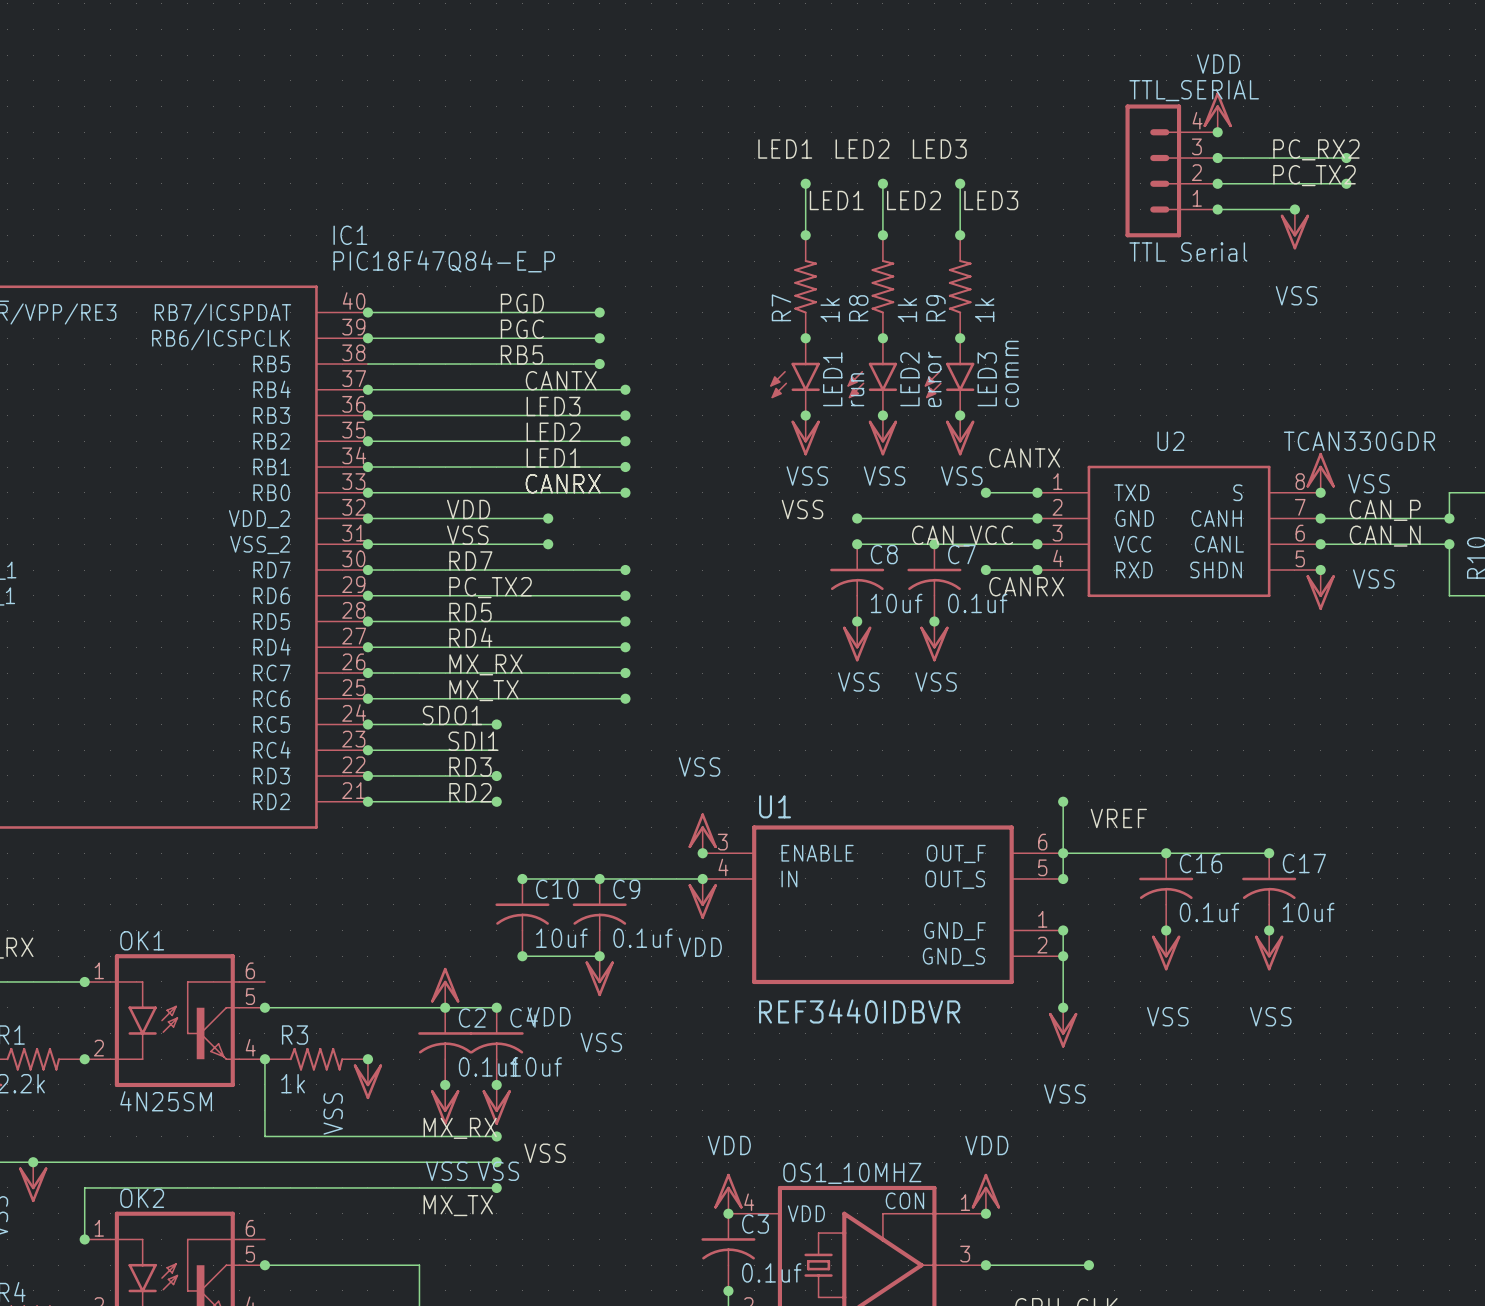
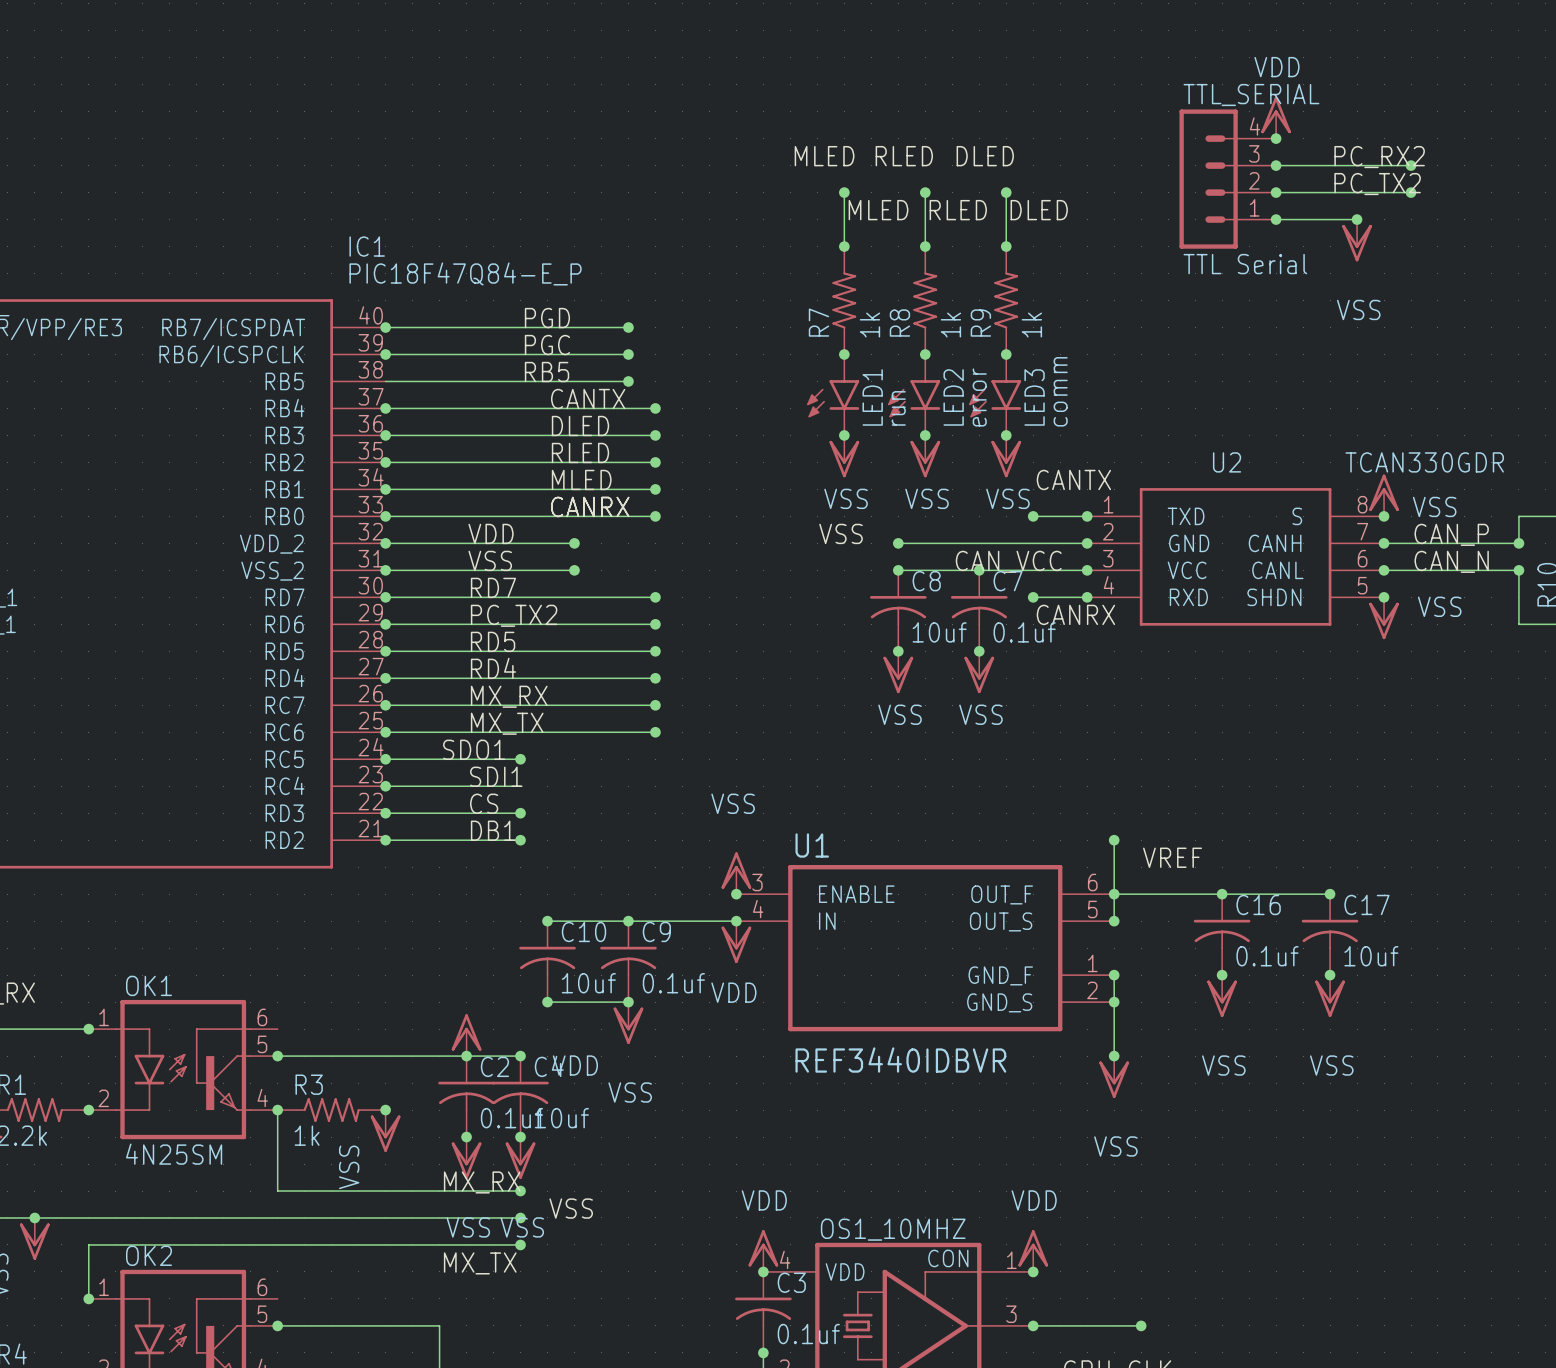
label: LED1 (785, 149) -> MLED (824, 156)
label: LED2 (862, 149) -> RLED (904, 156)
label: LED3 (939, 149) -> DLED (985, 156)
label: LED1 (836, 200) -> MLED (878, 210)
label: LED2 (914, 200) -> RLED (958, 210)
label: LED3 (991, 200) -> DLED (1039, 210)
label: LED3 (553, 406) -> DLED (580, 426)
label: LED2 (553, 432) -> RLED (580, 452)
label: LED1 (553, 457) -> MLED (581, 479)
label: RD3 (470, 766) -> CS (484, 803)
label: RD2 (470, 792) -> DB1 (493, 830)

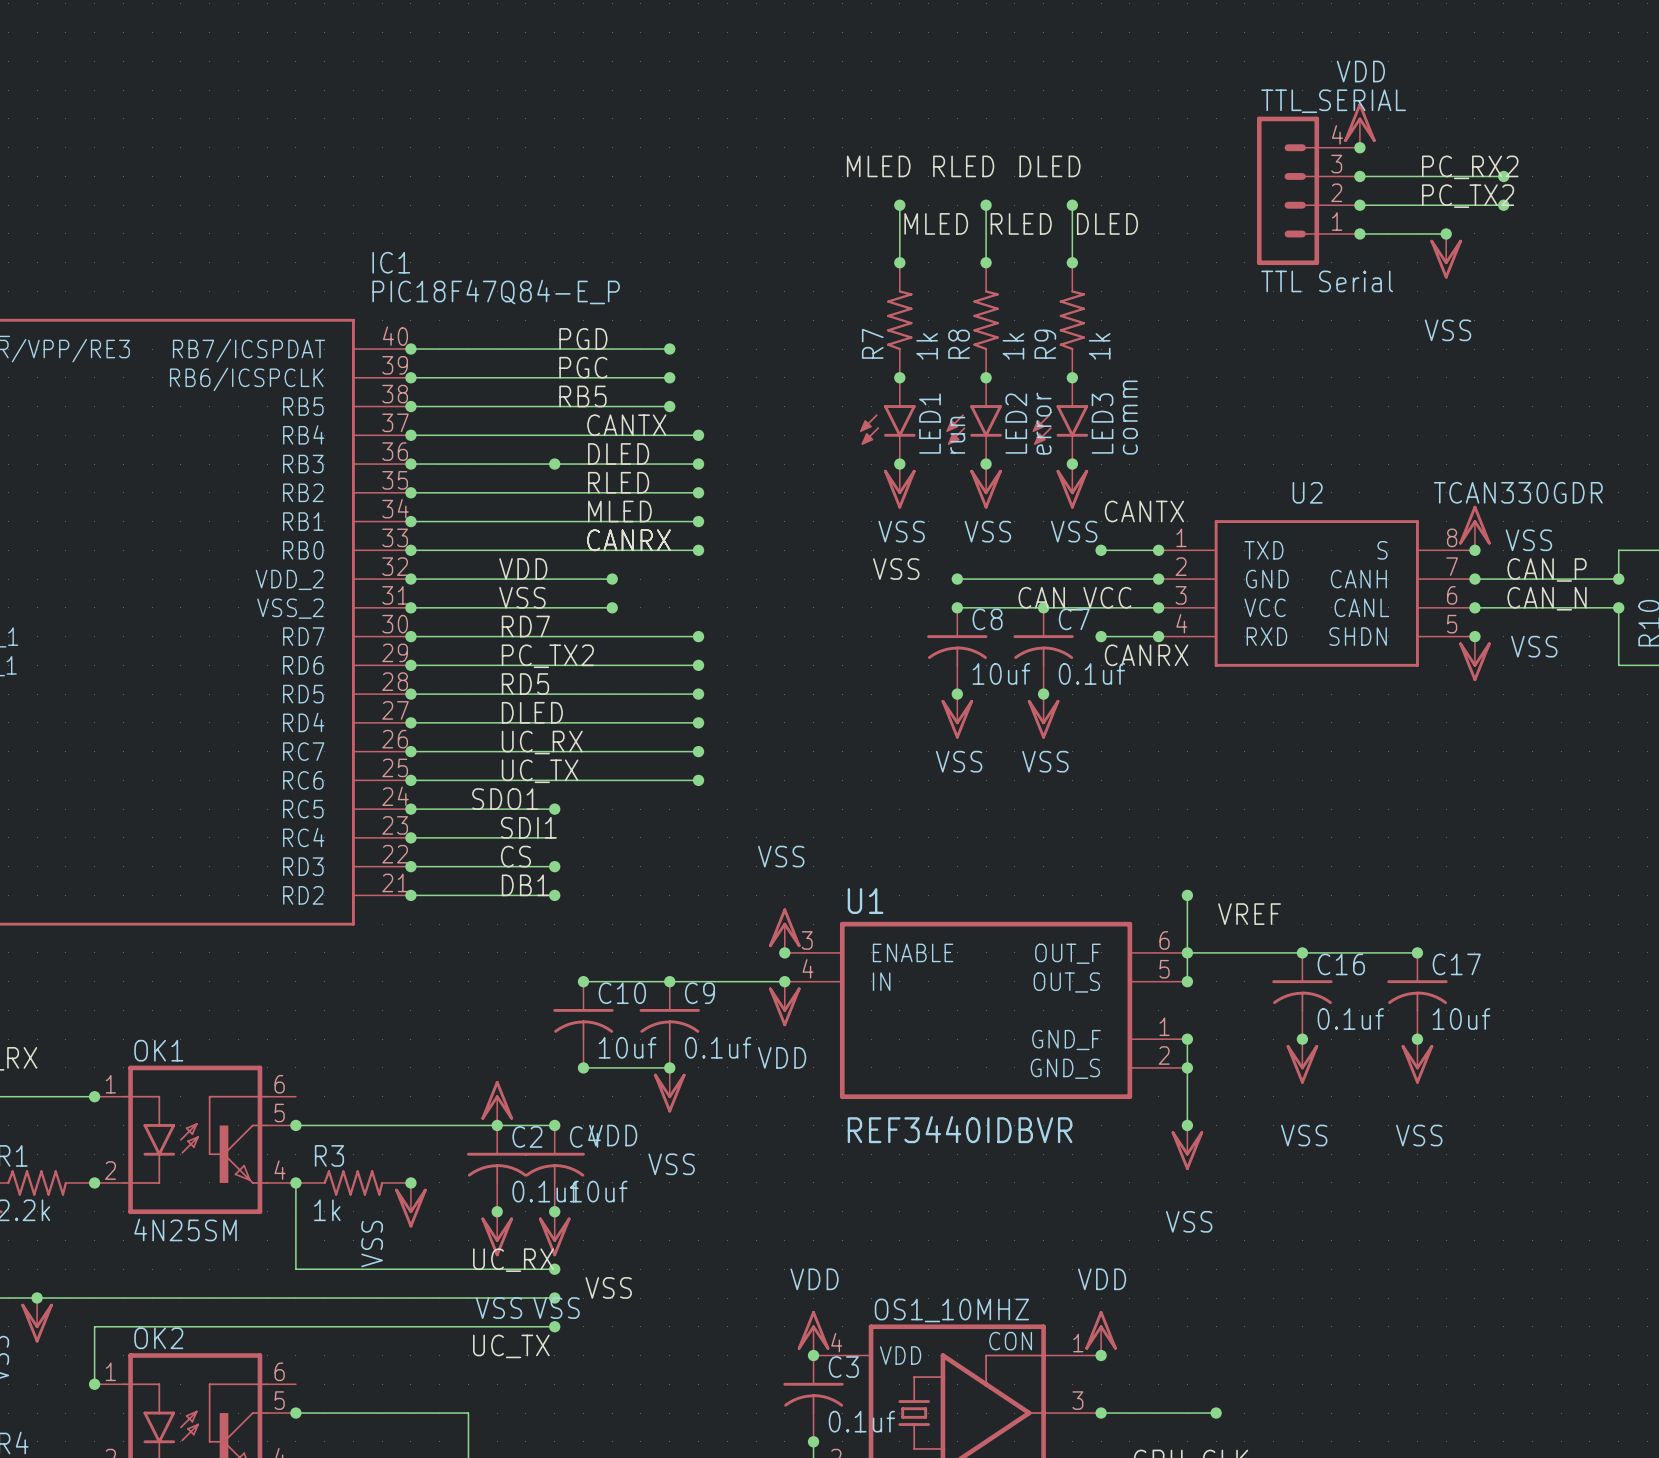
junction: none -> (410, 406)
junction: none -> (554, 464)
label: RD4 (493, 668) -> DLED (532, 712)
label: MX_RX (509, 696) -> UC_RX (542, 742)
label: MX_TX (507, 723) -> UC_TX (540, 771)
label: MX_RX (482, 1182) -> UC_RX (513, 1260)
label: MX_TX (480, 1263) -> UC_TX (511, 1346)

